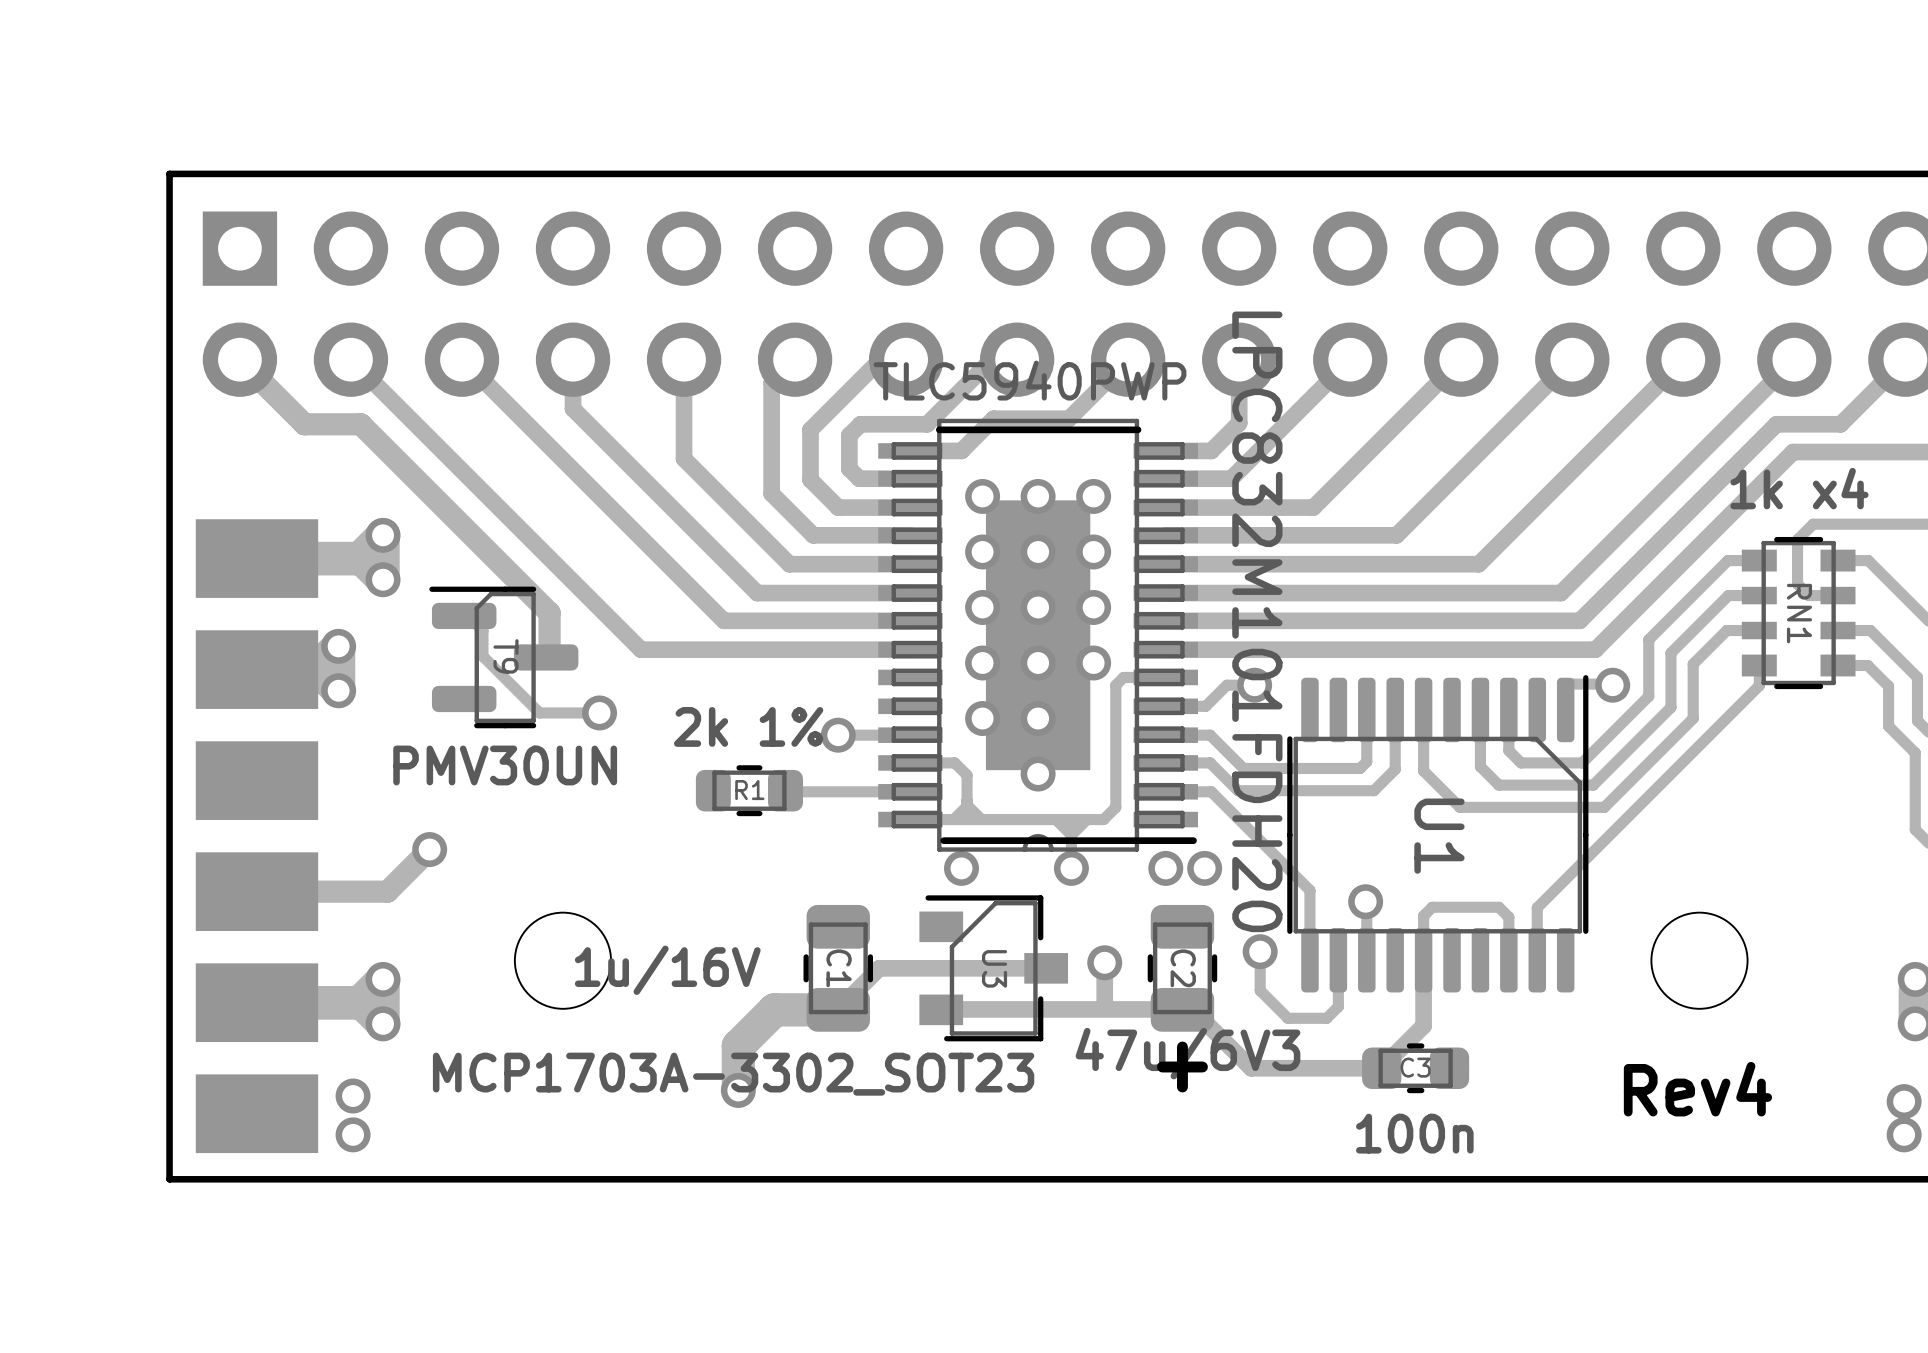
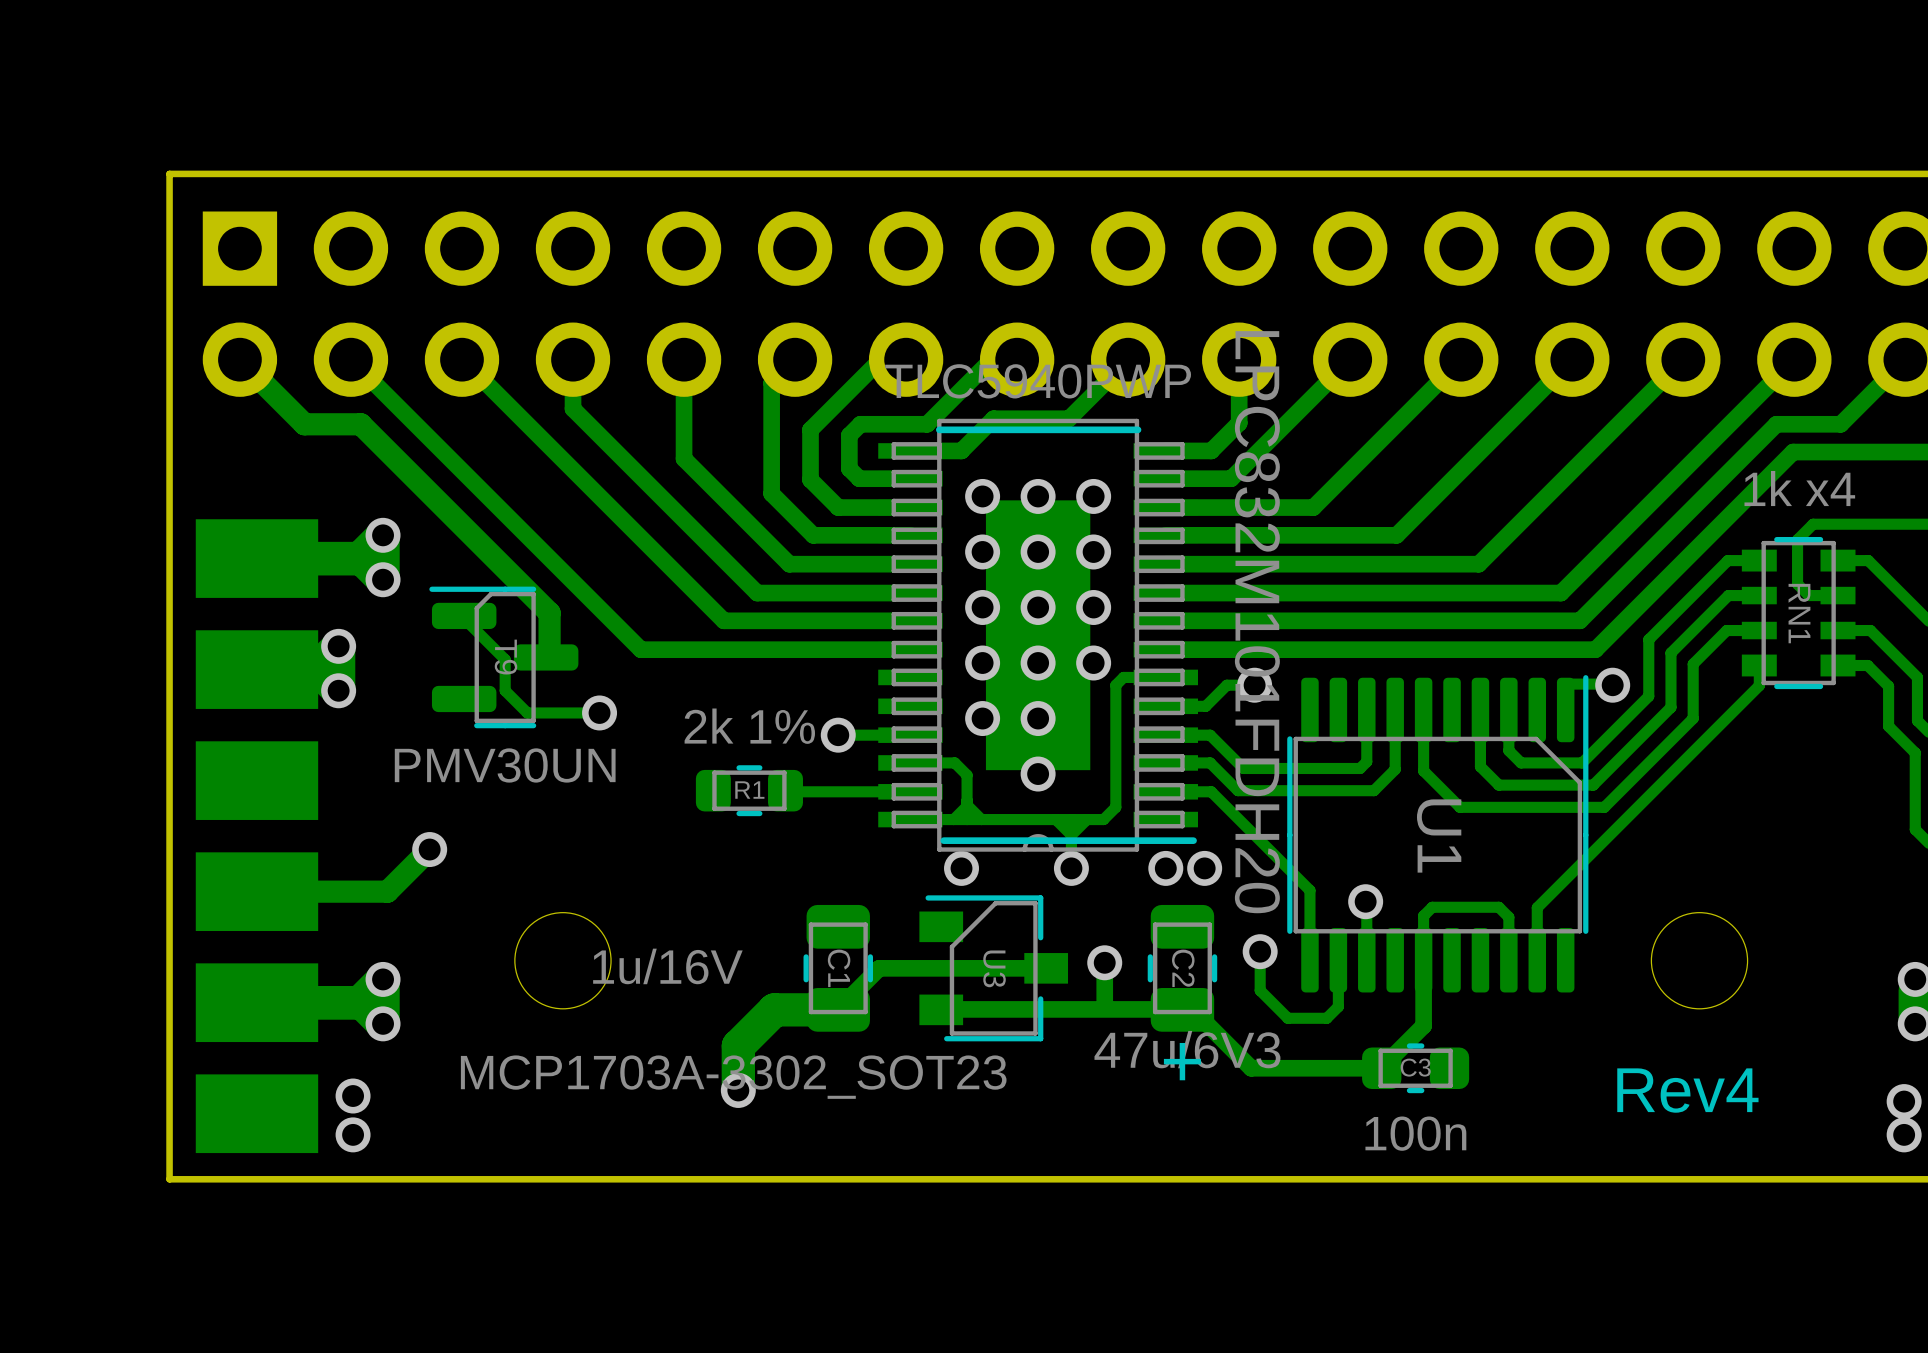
track: (464, 618) (470, 618) (482, 630) (482, 656) (539, 712) -> (461, 615) (505, 659) (505, 690) (527, 712) (539, 712)

